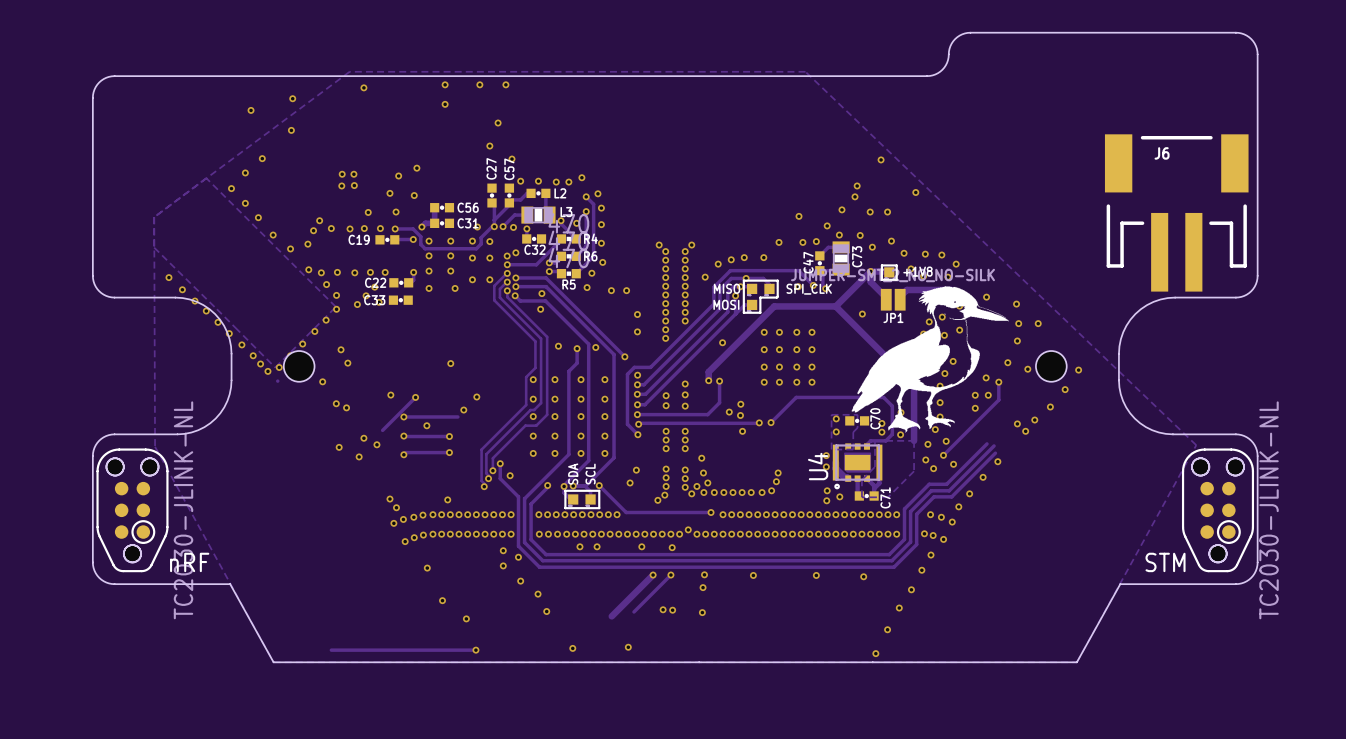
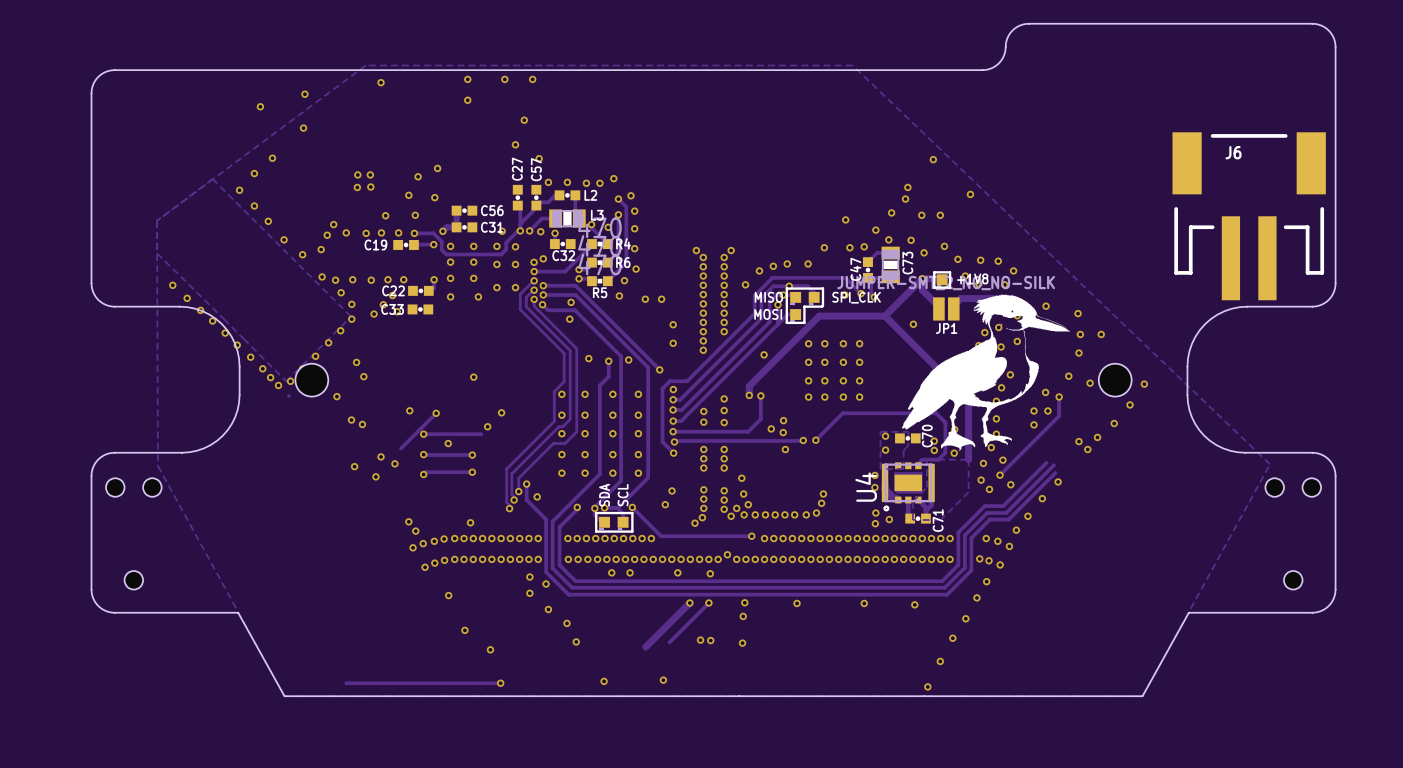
part: TC2030-JLINK-NL (132, 510) -> none
part: TC2030-JLINK-NL (1218, 510) -> none
text: nRF (189, 562) -> none
text: STM (1165, 562) -> none

